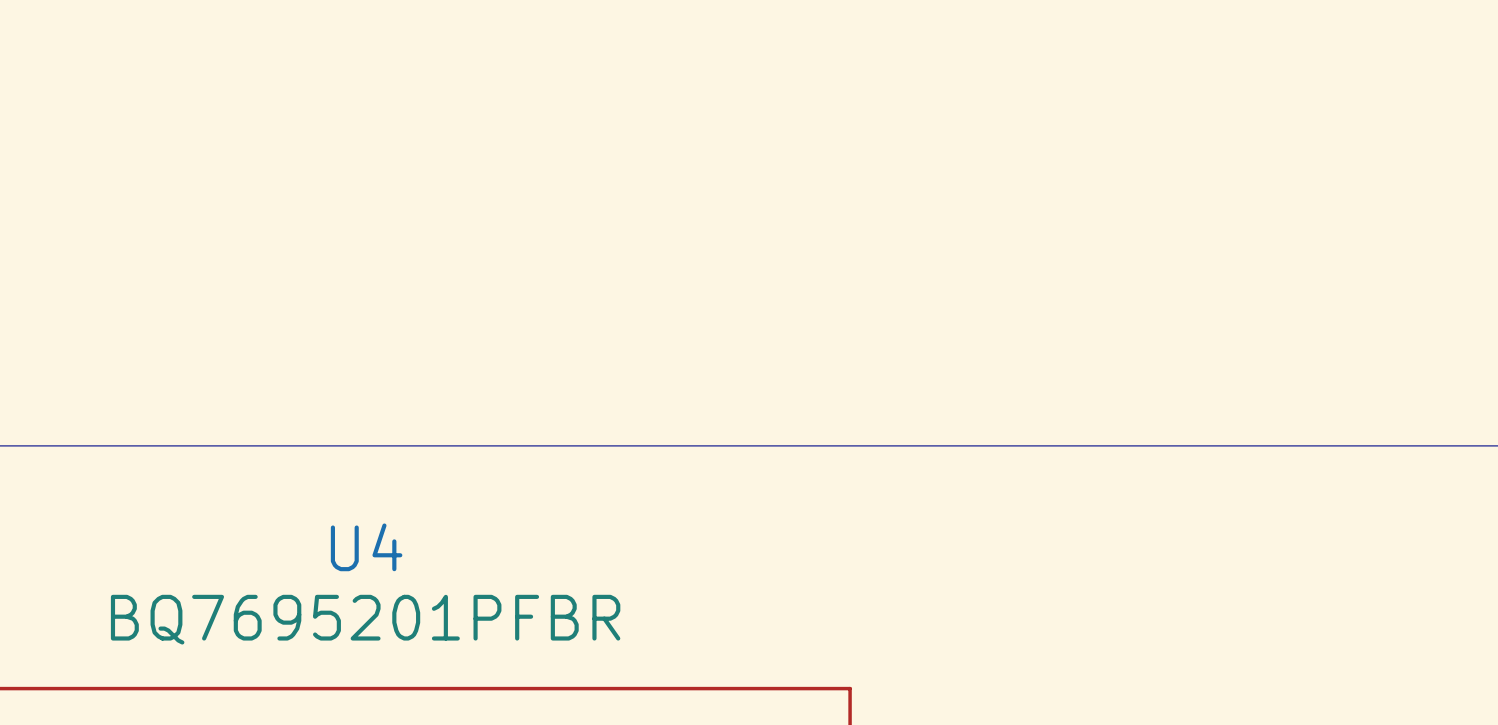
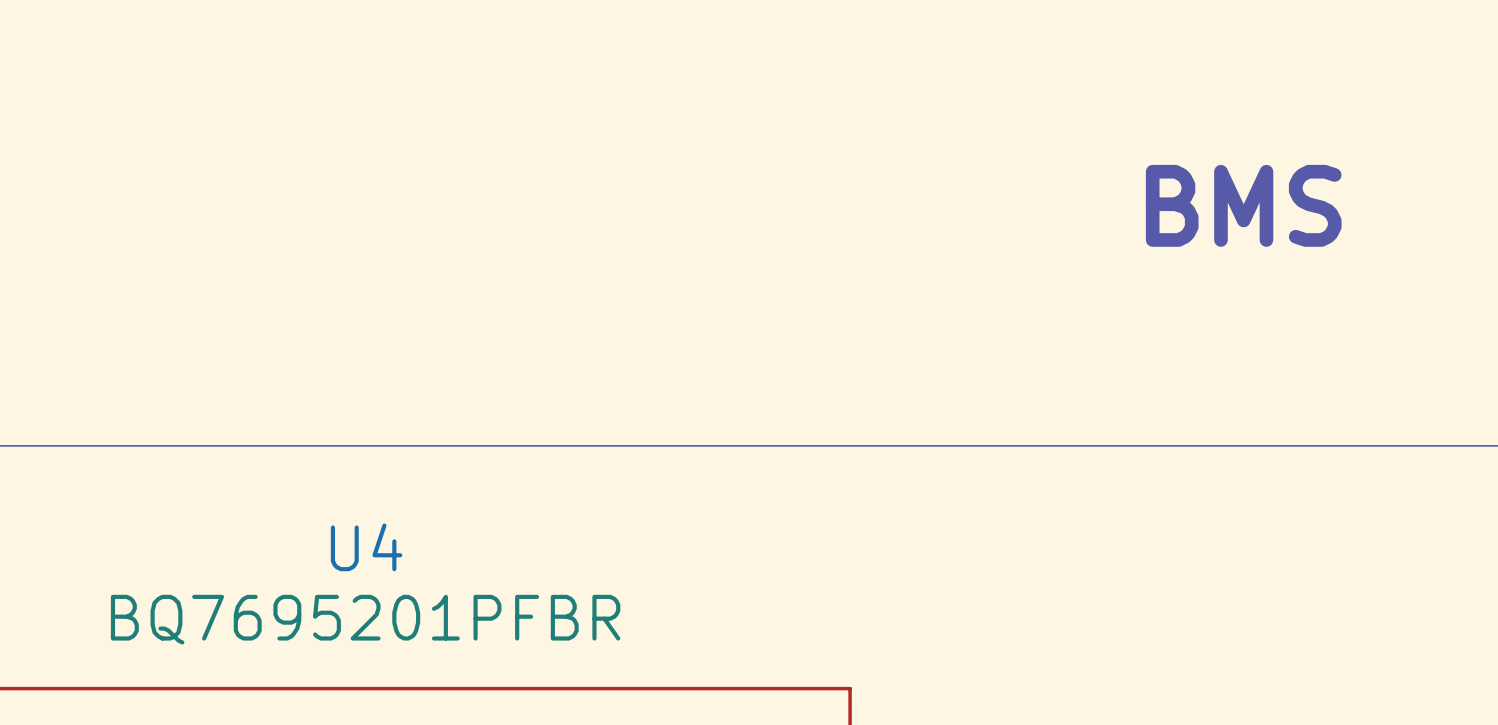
text: none -> BMS (1243, 205)

